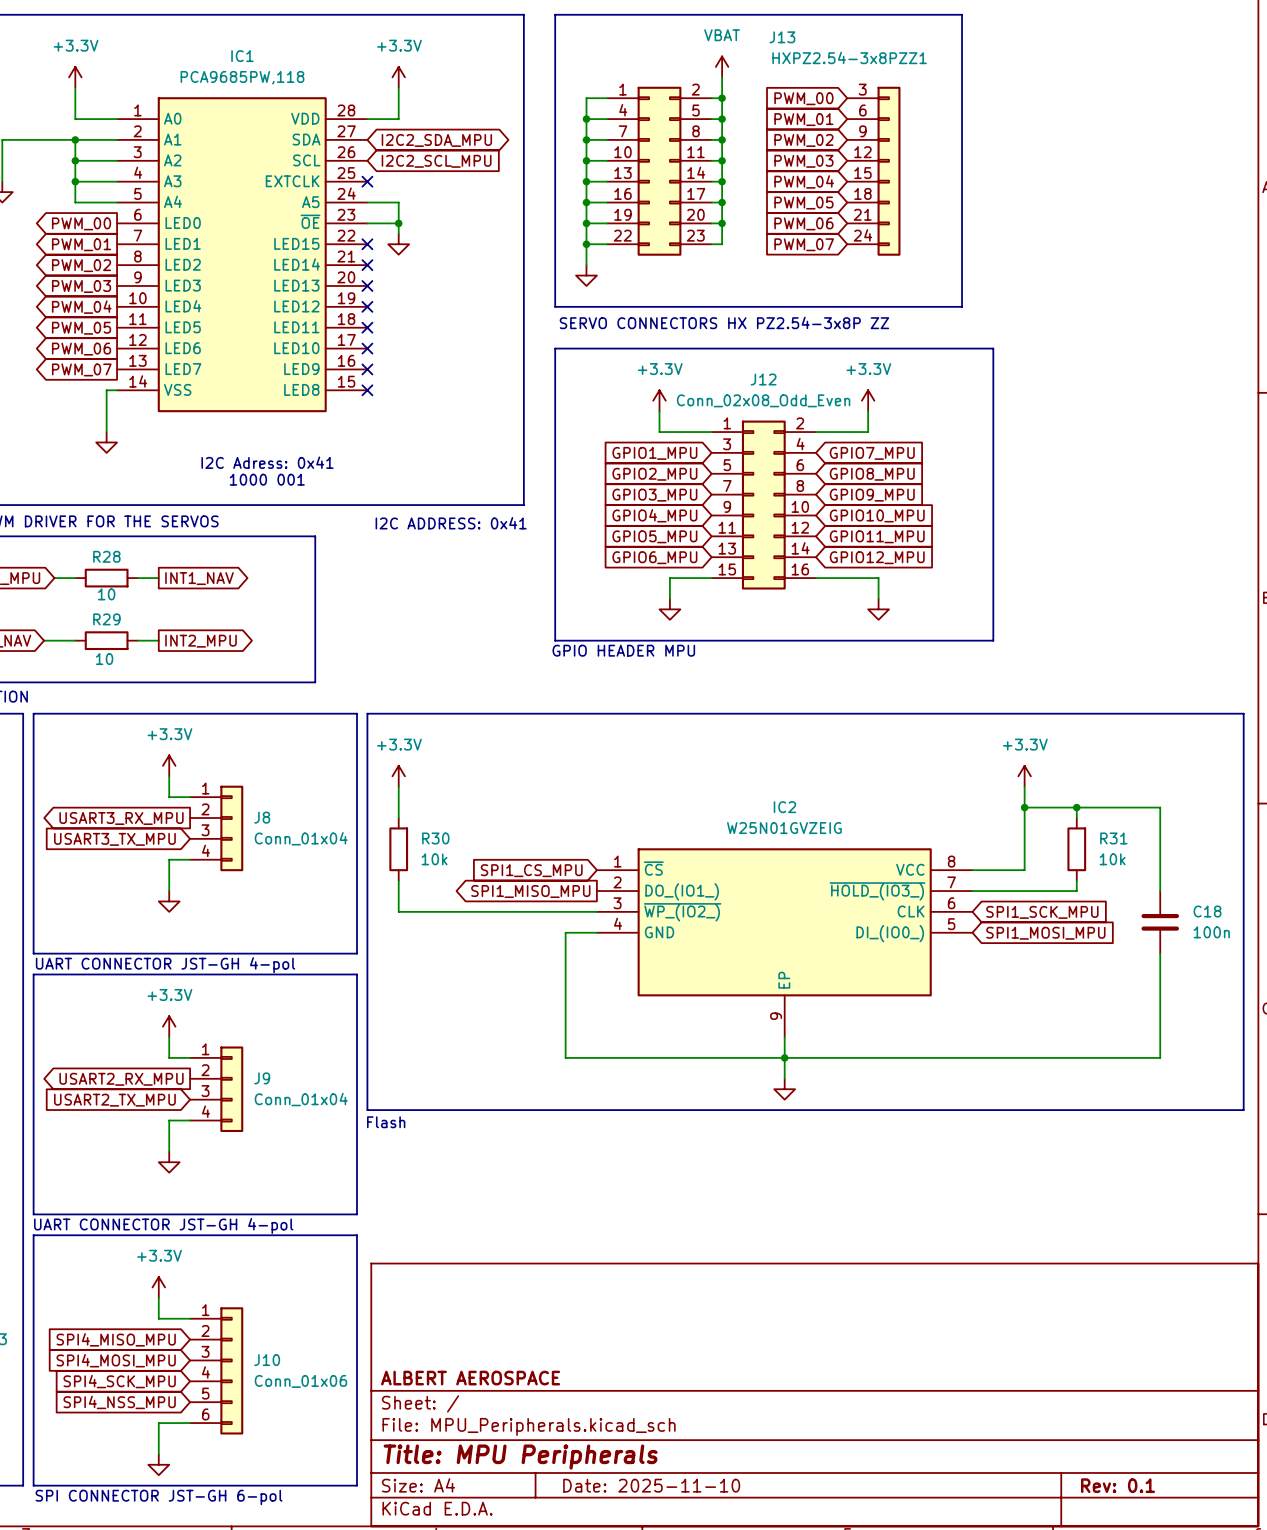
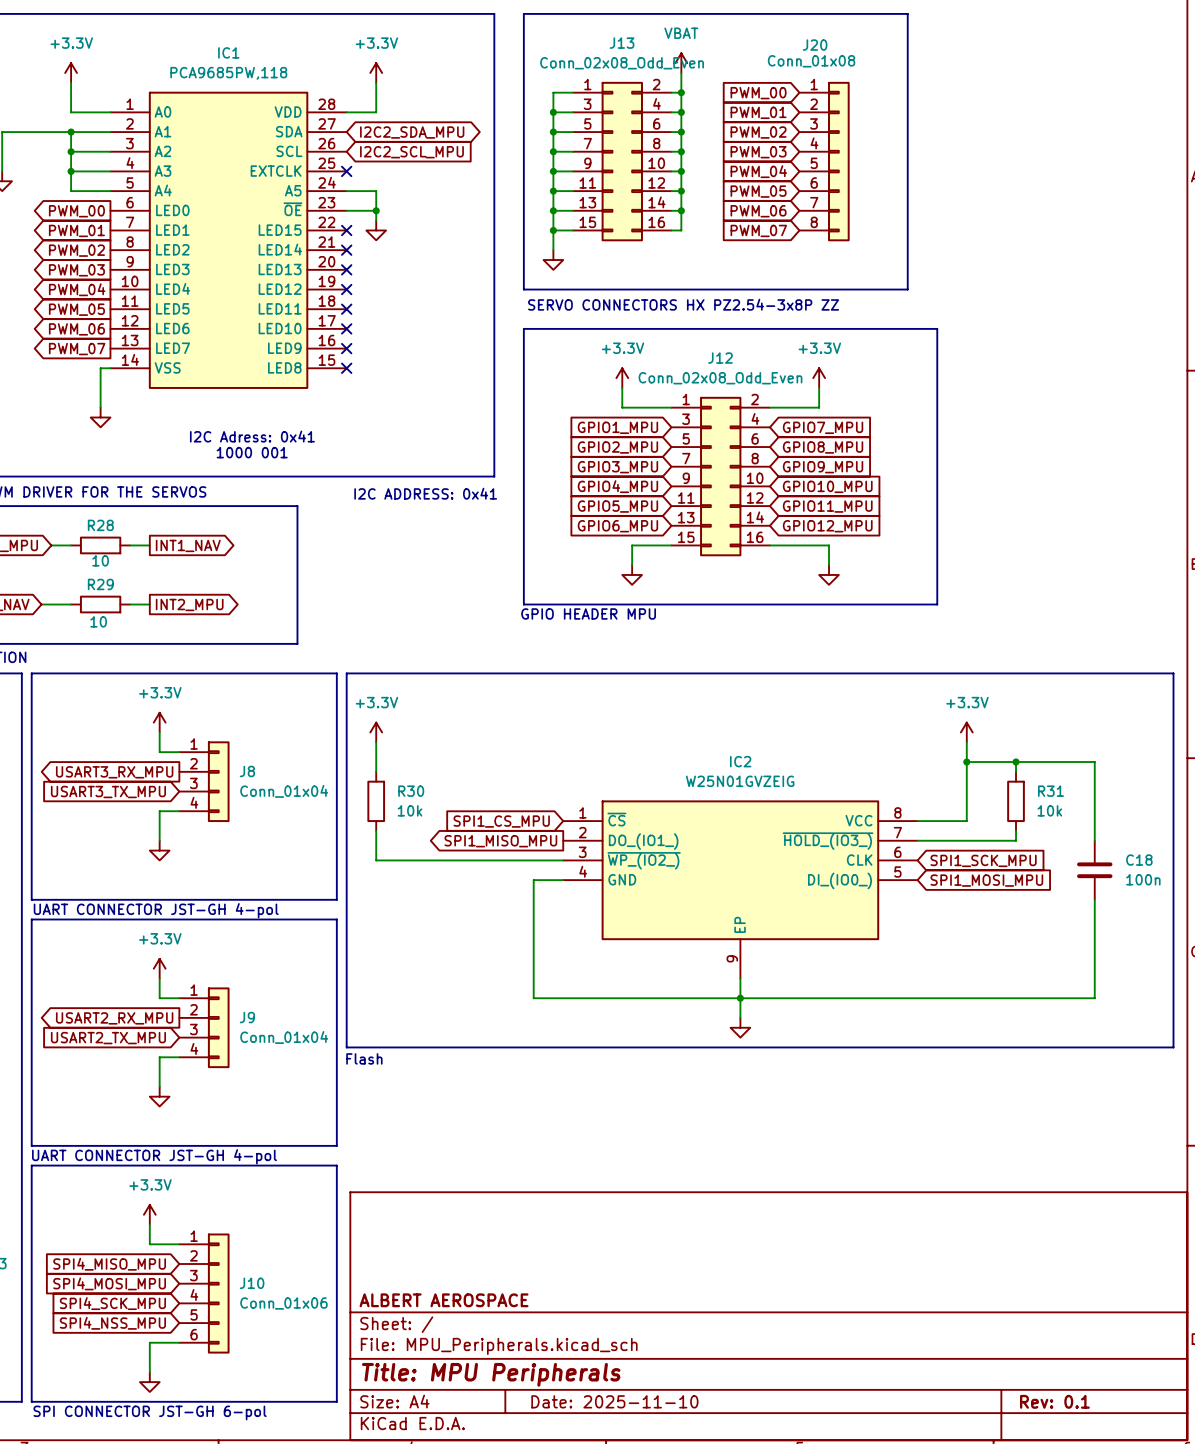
J13 name position: J13 (782, 37) -> J13 (622, 43)
J13 value: HXPZ2.54-3x8PZZ1 (849, 57) -> Conn_02x08_Odd_Even (622, 63)
J13 symbol: [607, 86, 901, 256] -> [573, 81, 672, 242]
J20: none -> Conn_01x08 (824, 161)

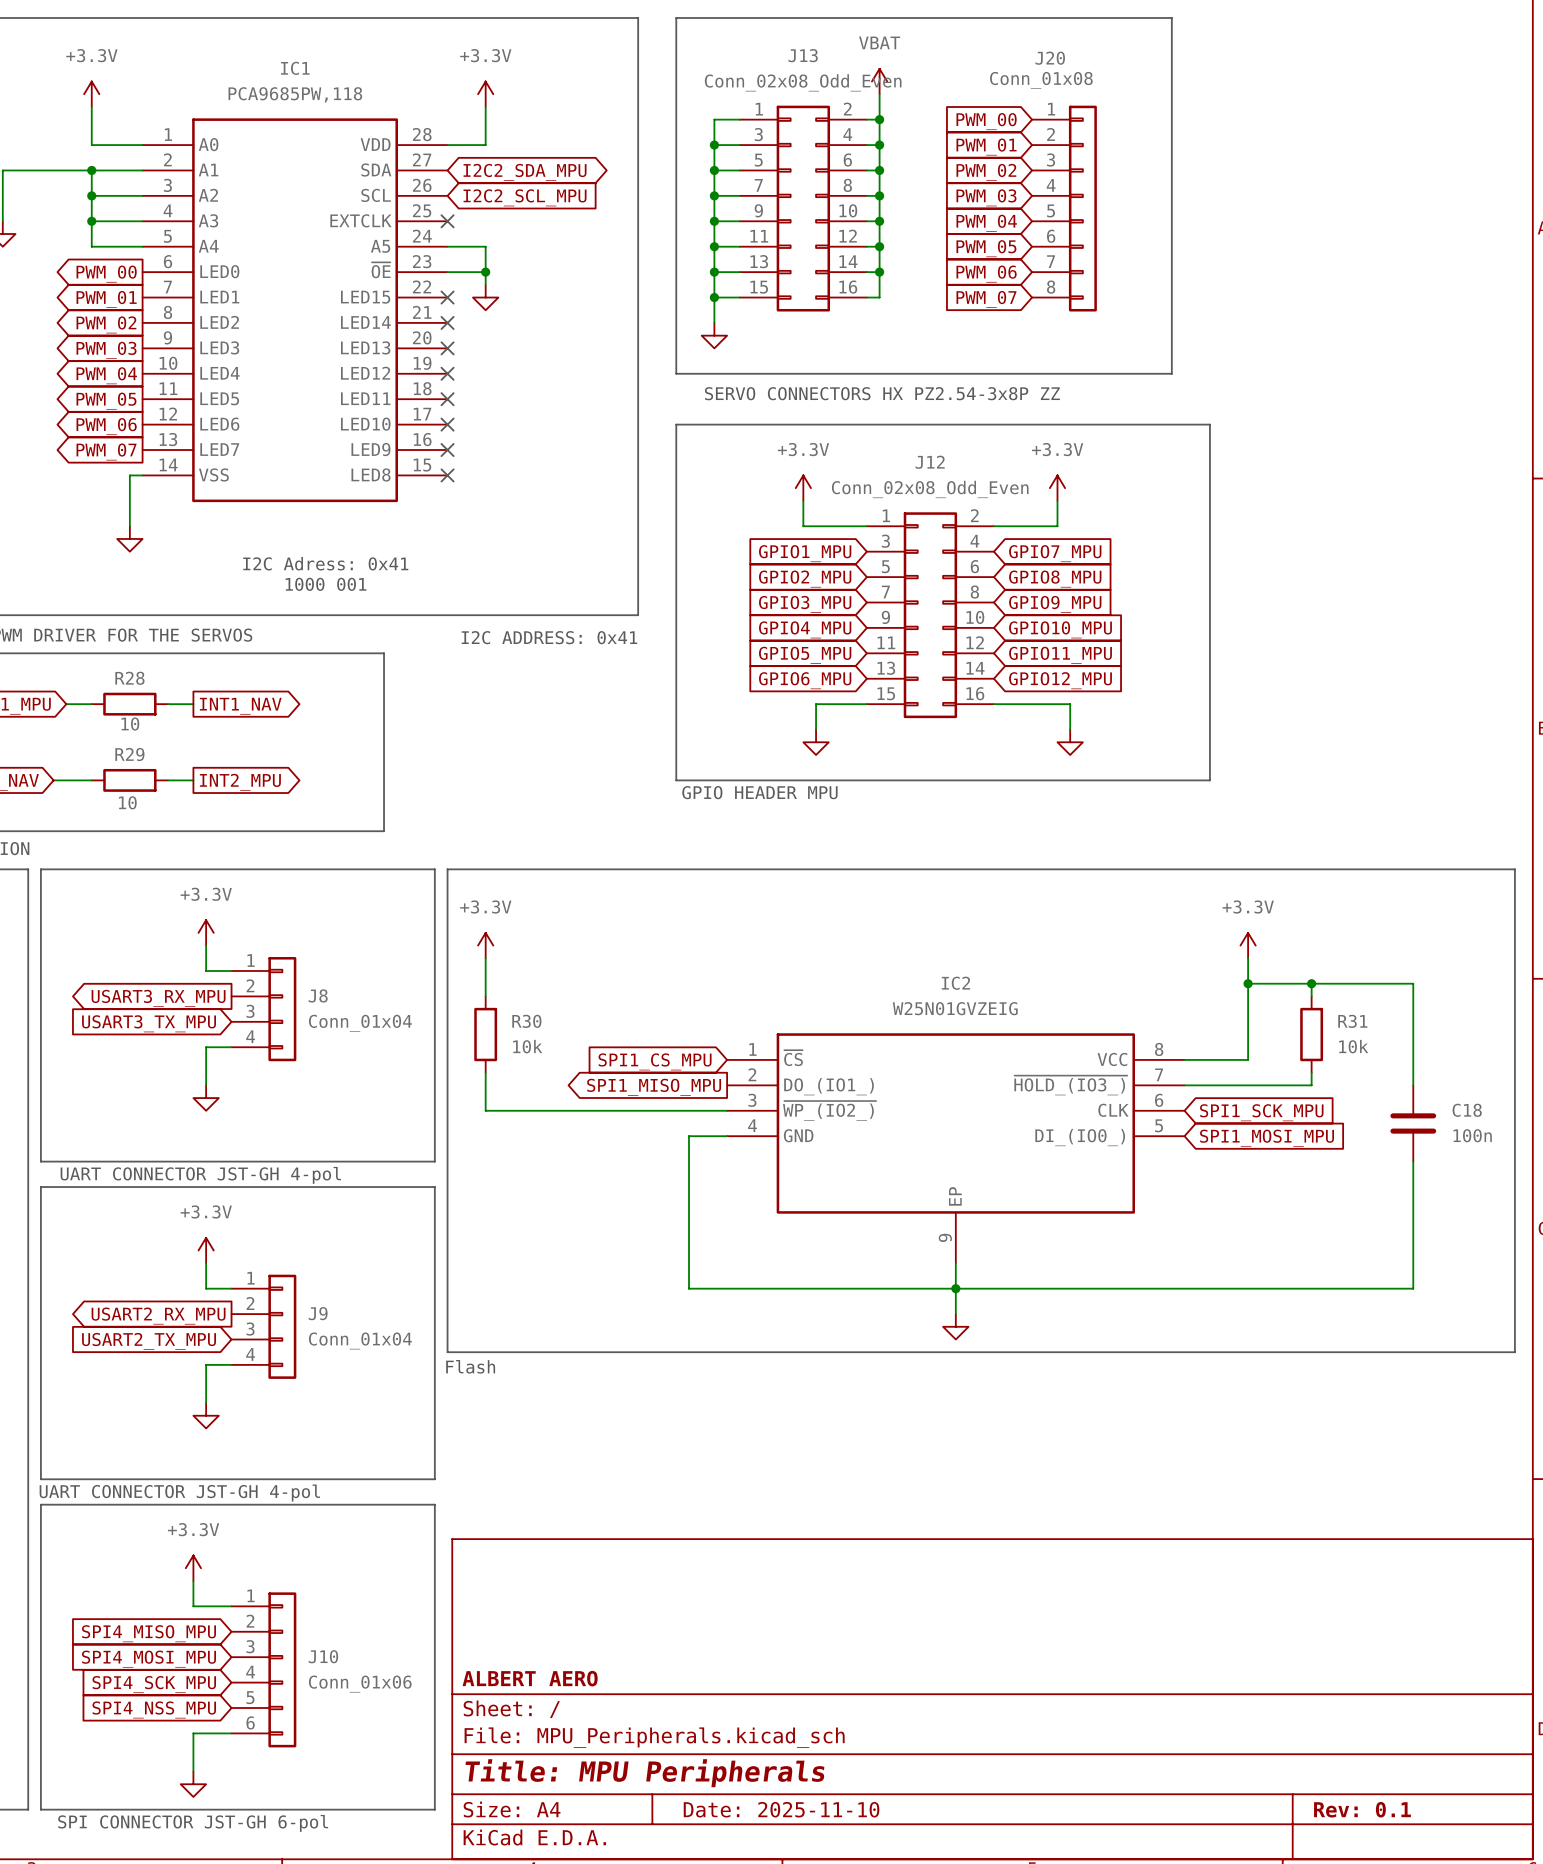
title block: ALBERT AEROSPACE (444, 1300) -> ALBERT AERO (530, 1678)

